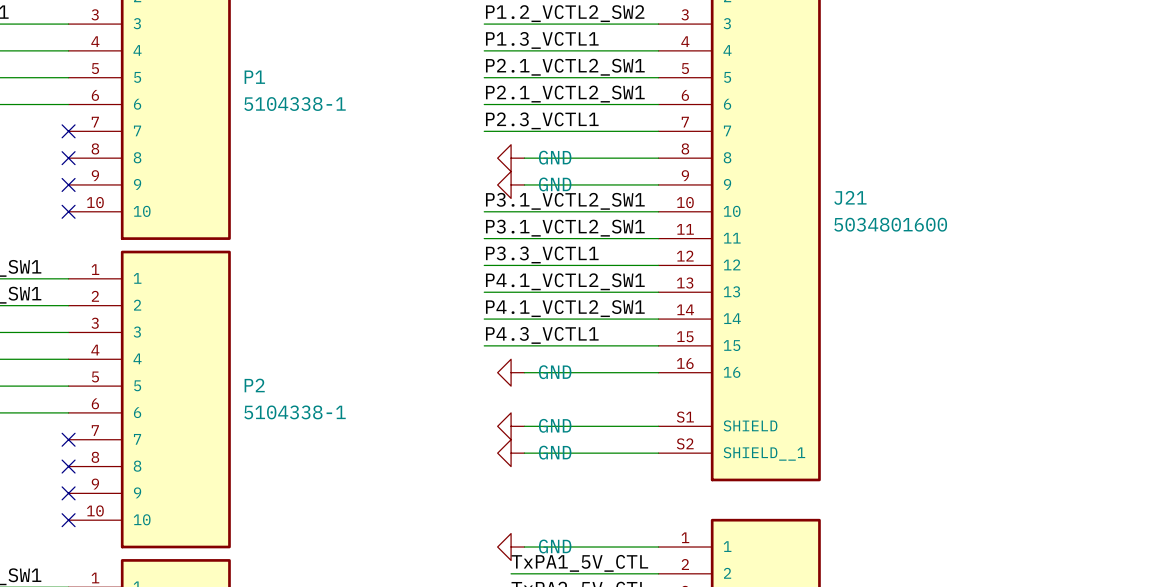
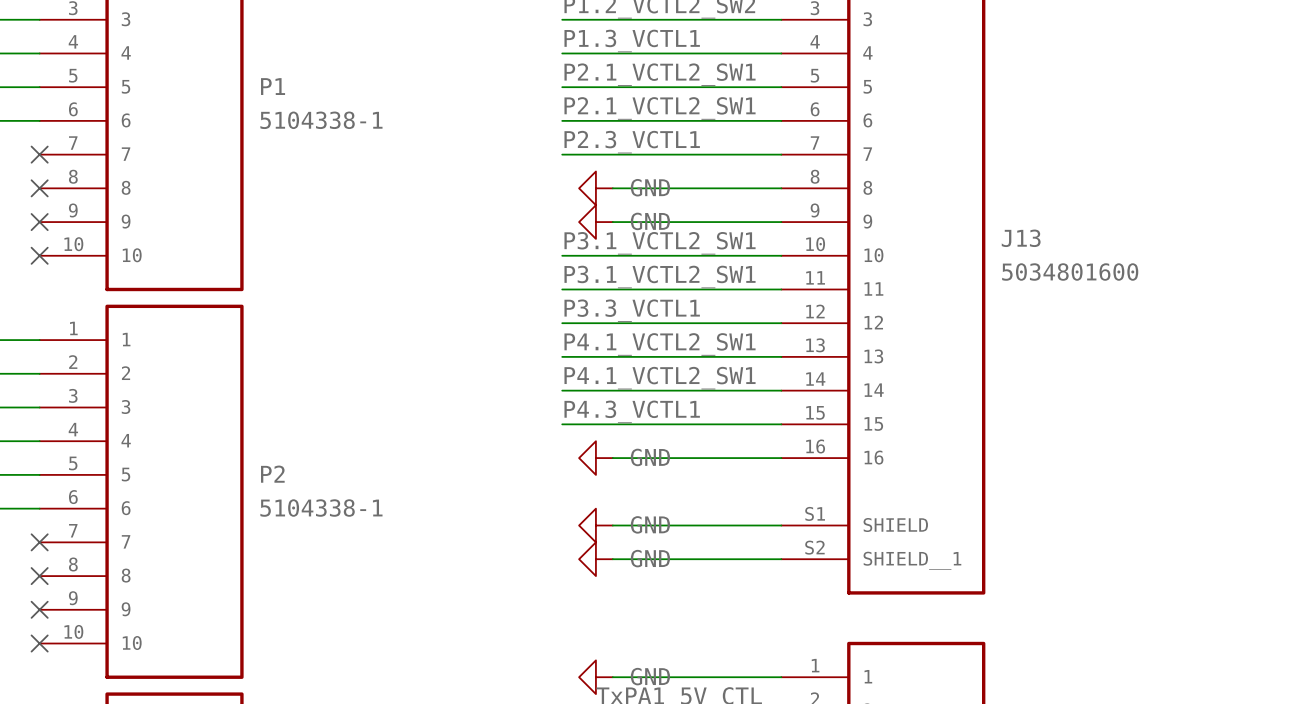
J21 name: J21 (850, 197) -> J13 (1021, 238)

